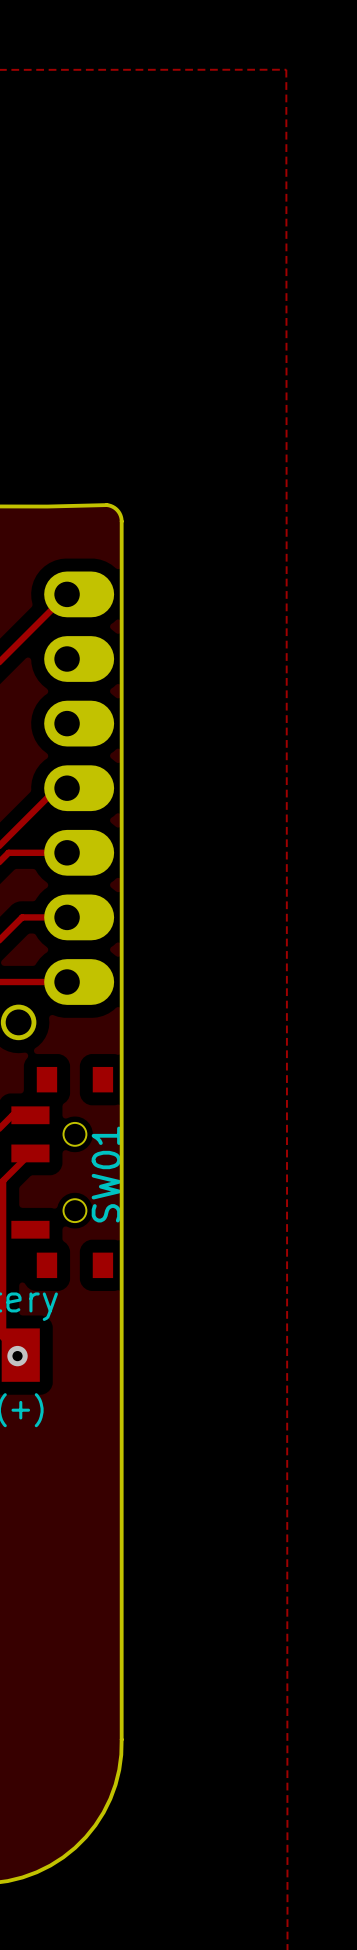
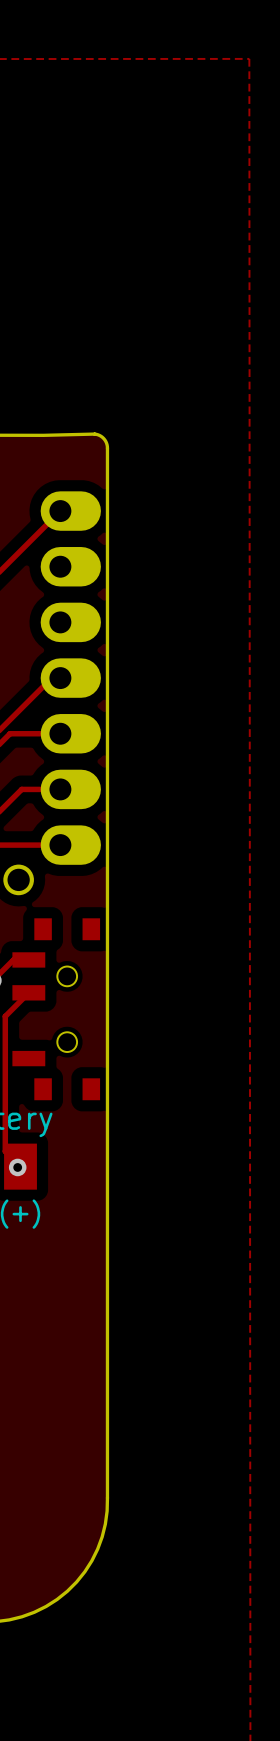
SW01 name: SW01 (106, 1174) -> none

